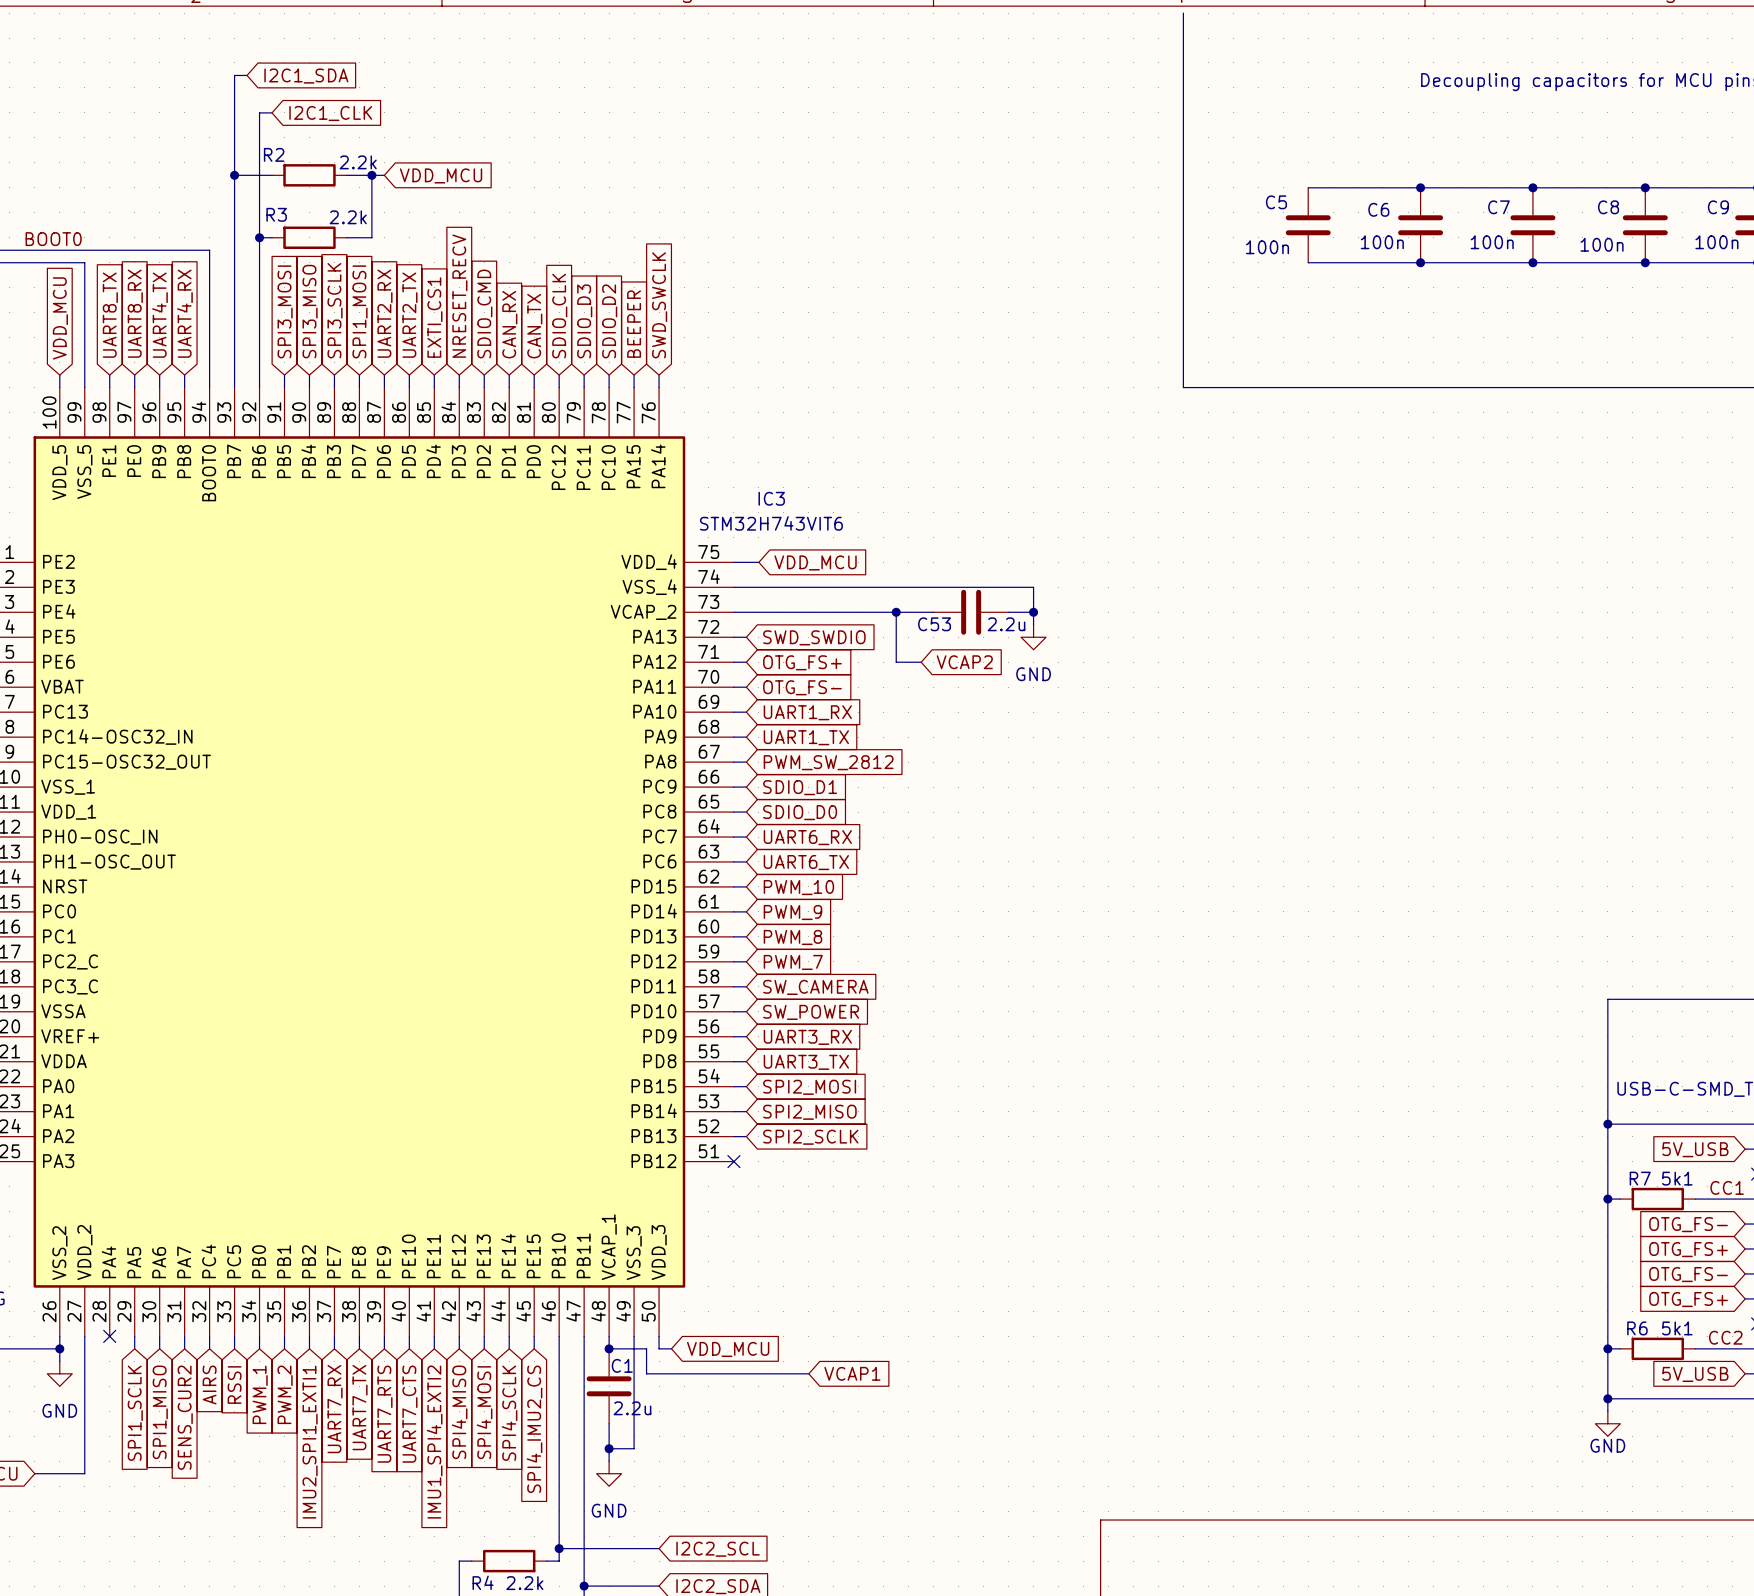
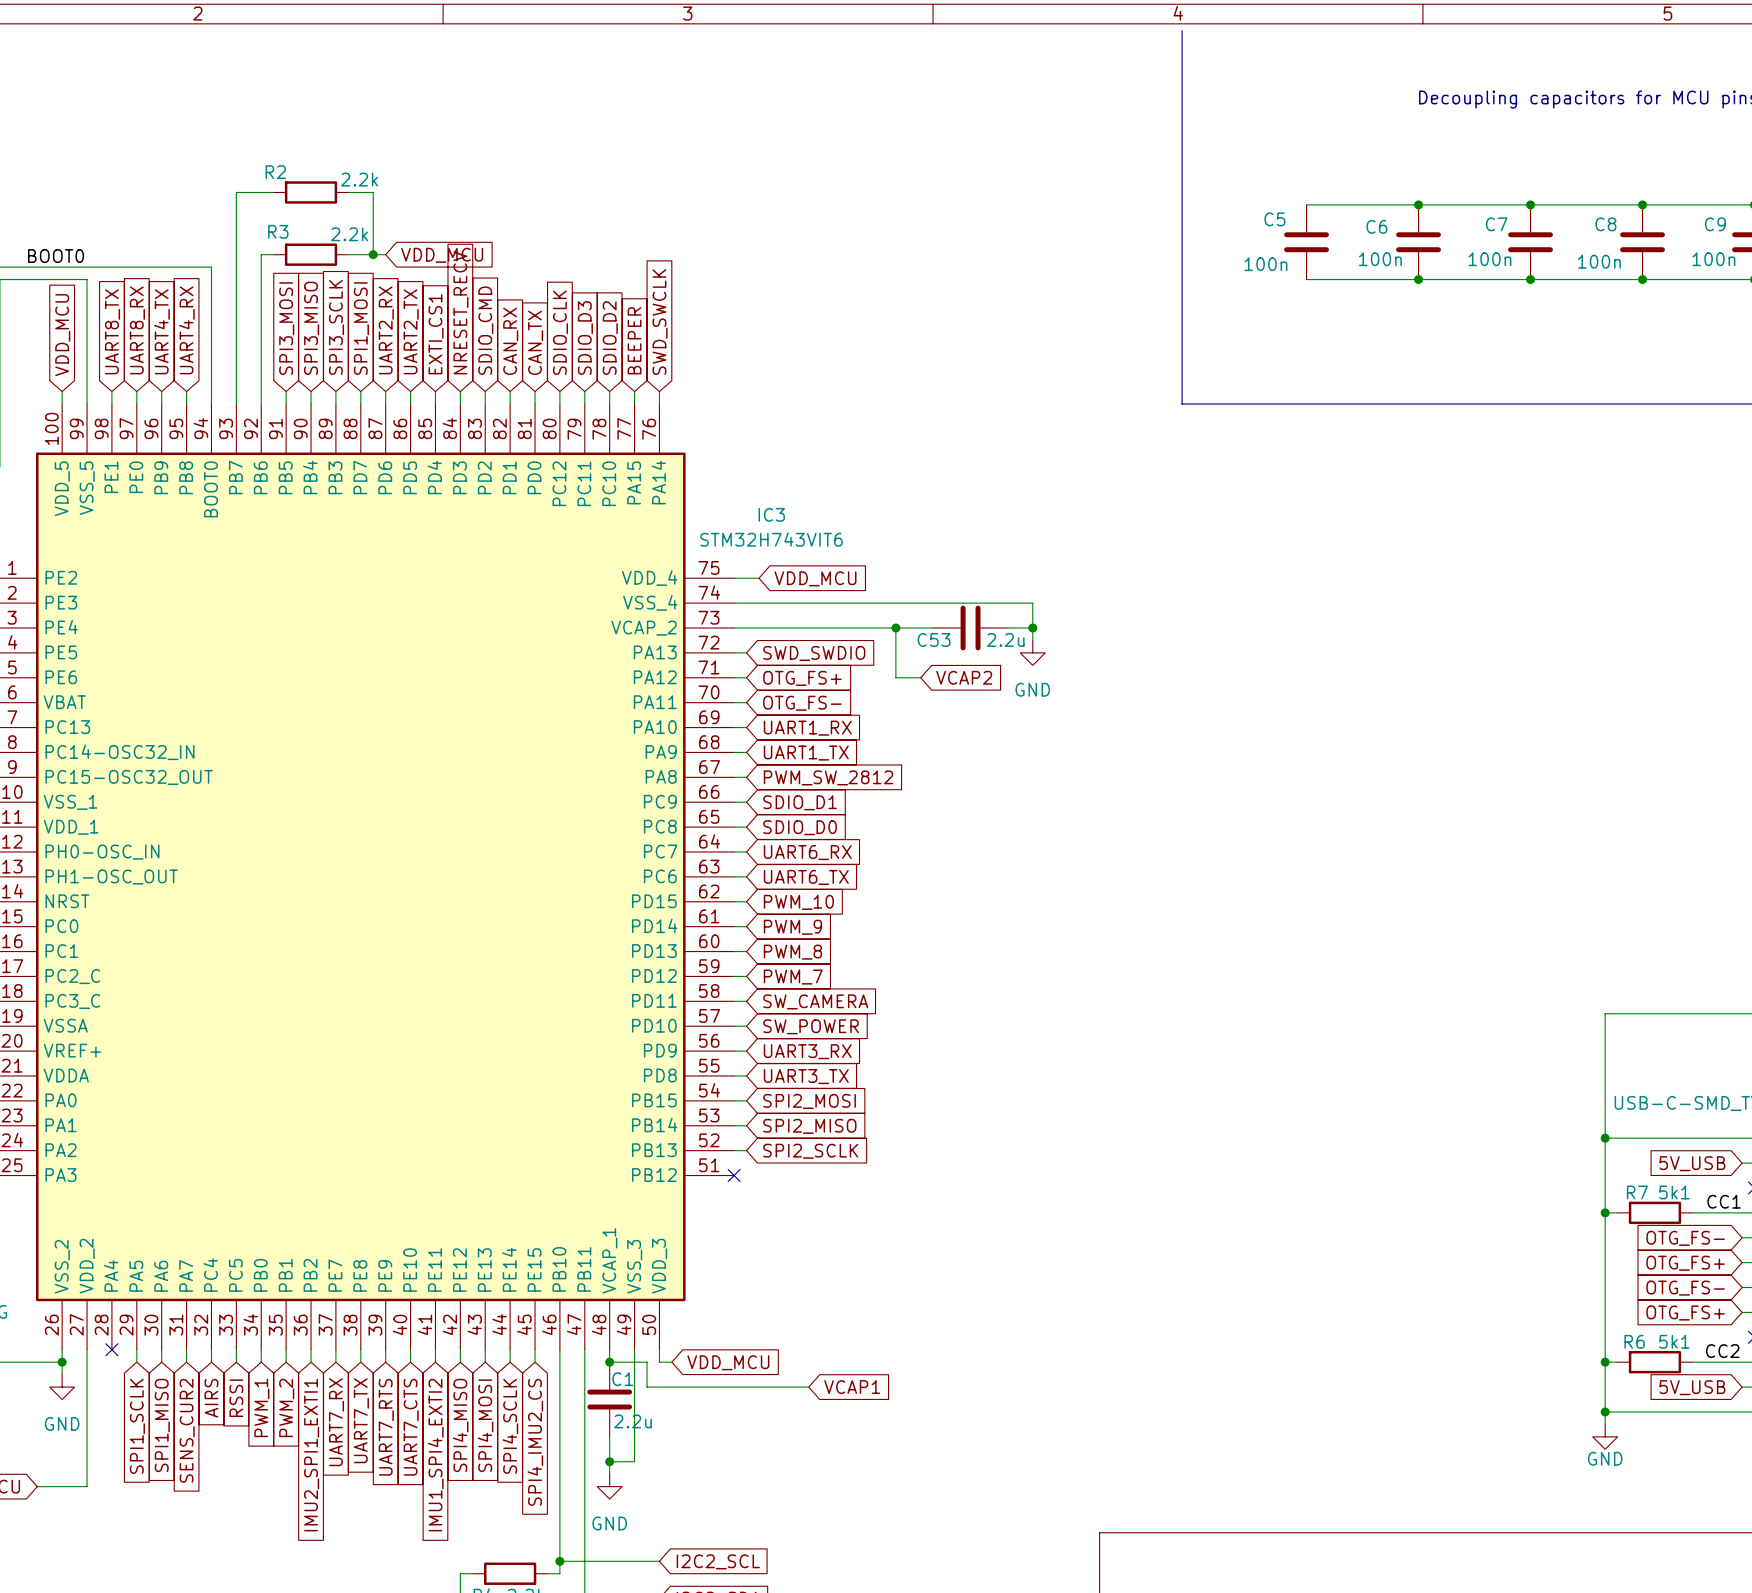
wire: (247, 75) (234, 75) (234, 175) -> none
global label: I2C1_SDA (306, 76) -> none
wire: (272, 112) (259, 112) (259, 237) -> none
global label: I2C1_CLK (330, 113) -> none
junction: (234, 175) -> none
wire: (371, 175) (384, 175) -> (373, 254) (385, 254)
junction: (371, 175) -> none
global label position: VDD_MCU (441, 175) -> VDD_MCU (442, 255)
junction: (259, 237) -> none
junction: none -> (373, 254)

